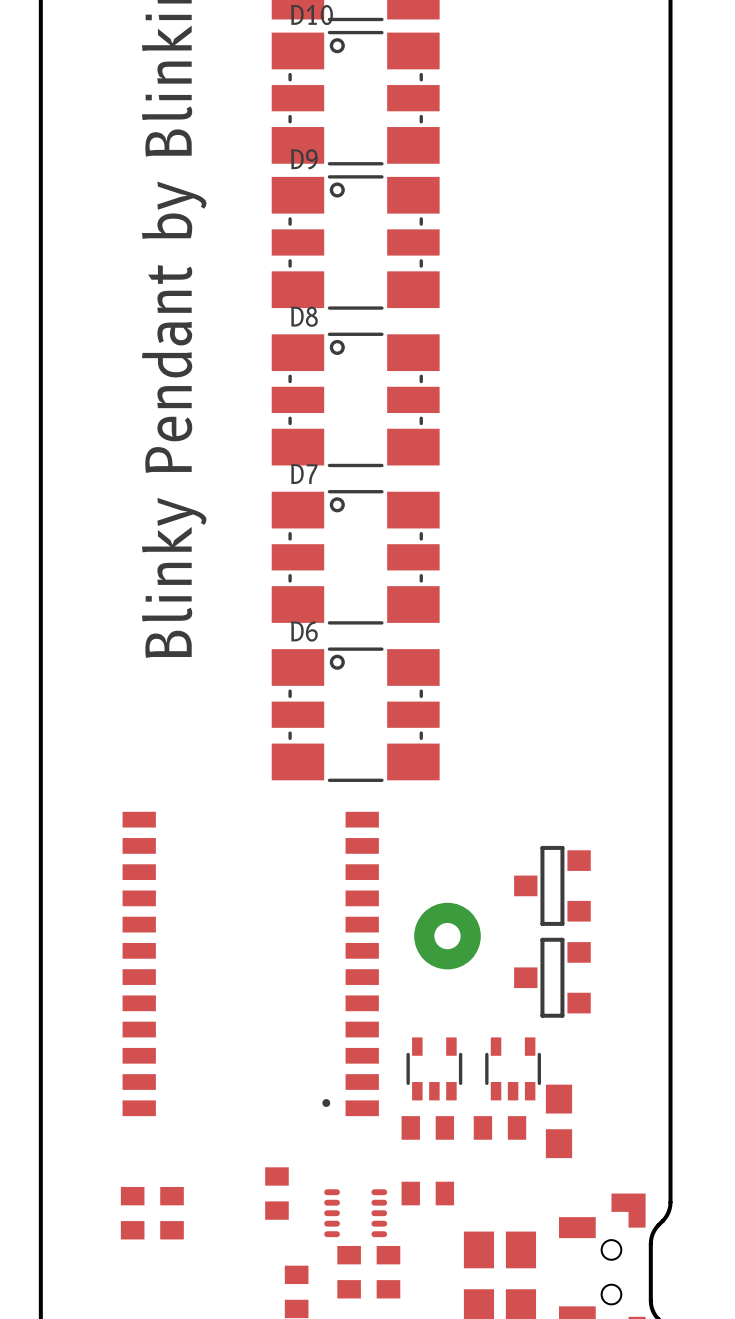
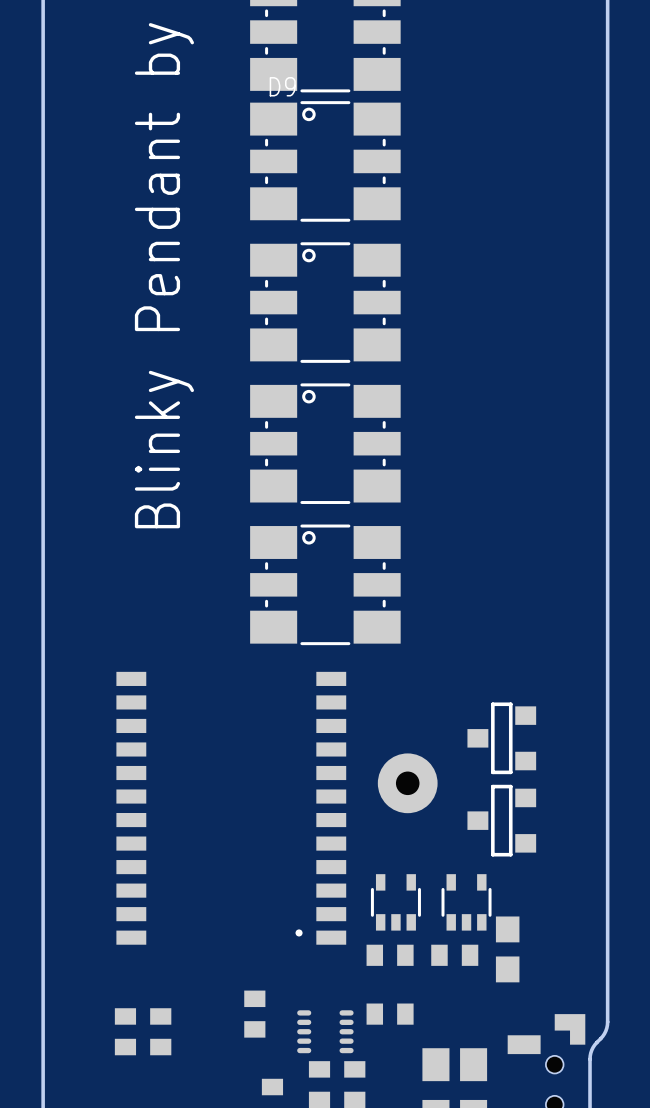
D8 name: D8 (304, 316) -> none
D7 name: D7 (304, 474) -> none
D6 name: D6 (304, 631) -> none

